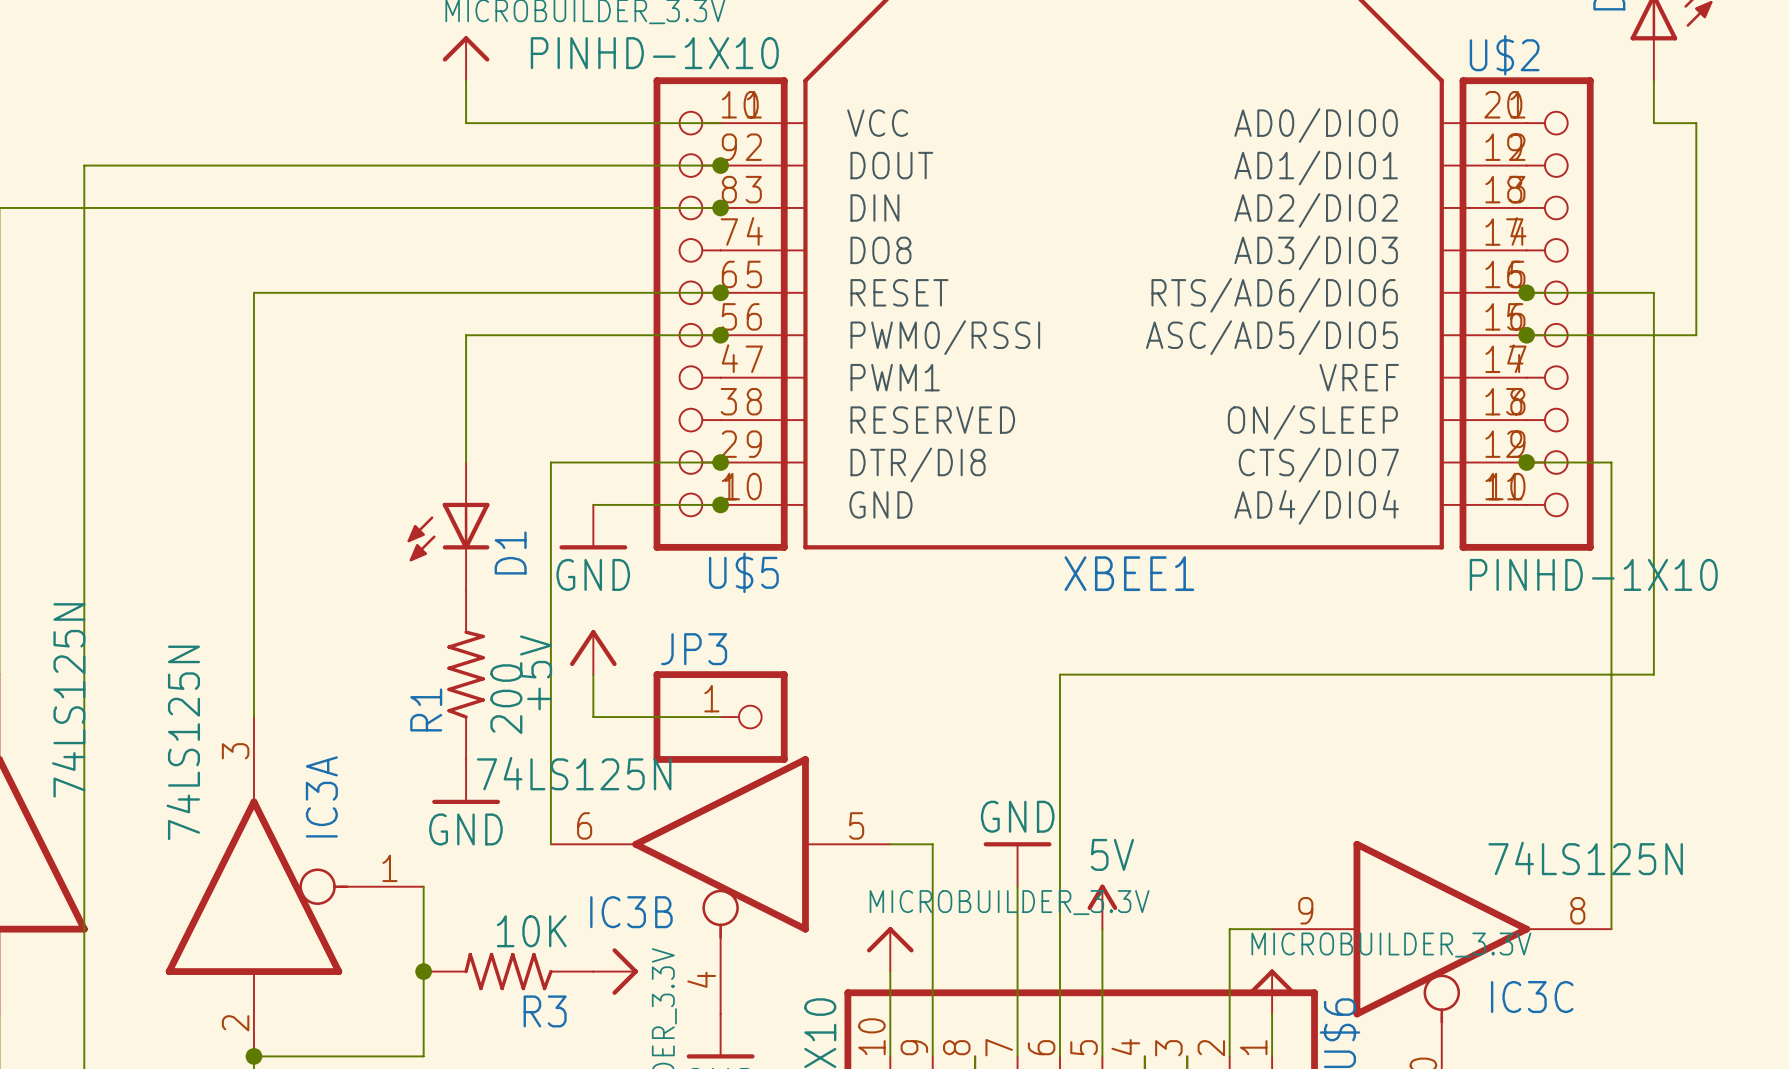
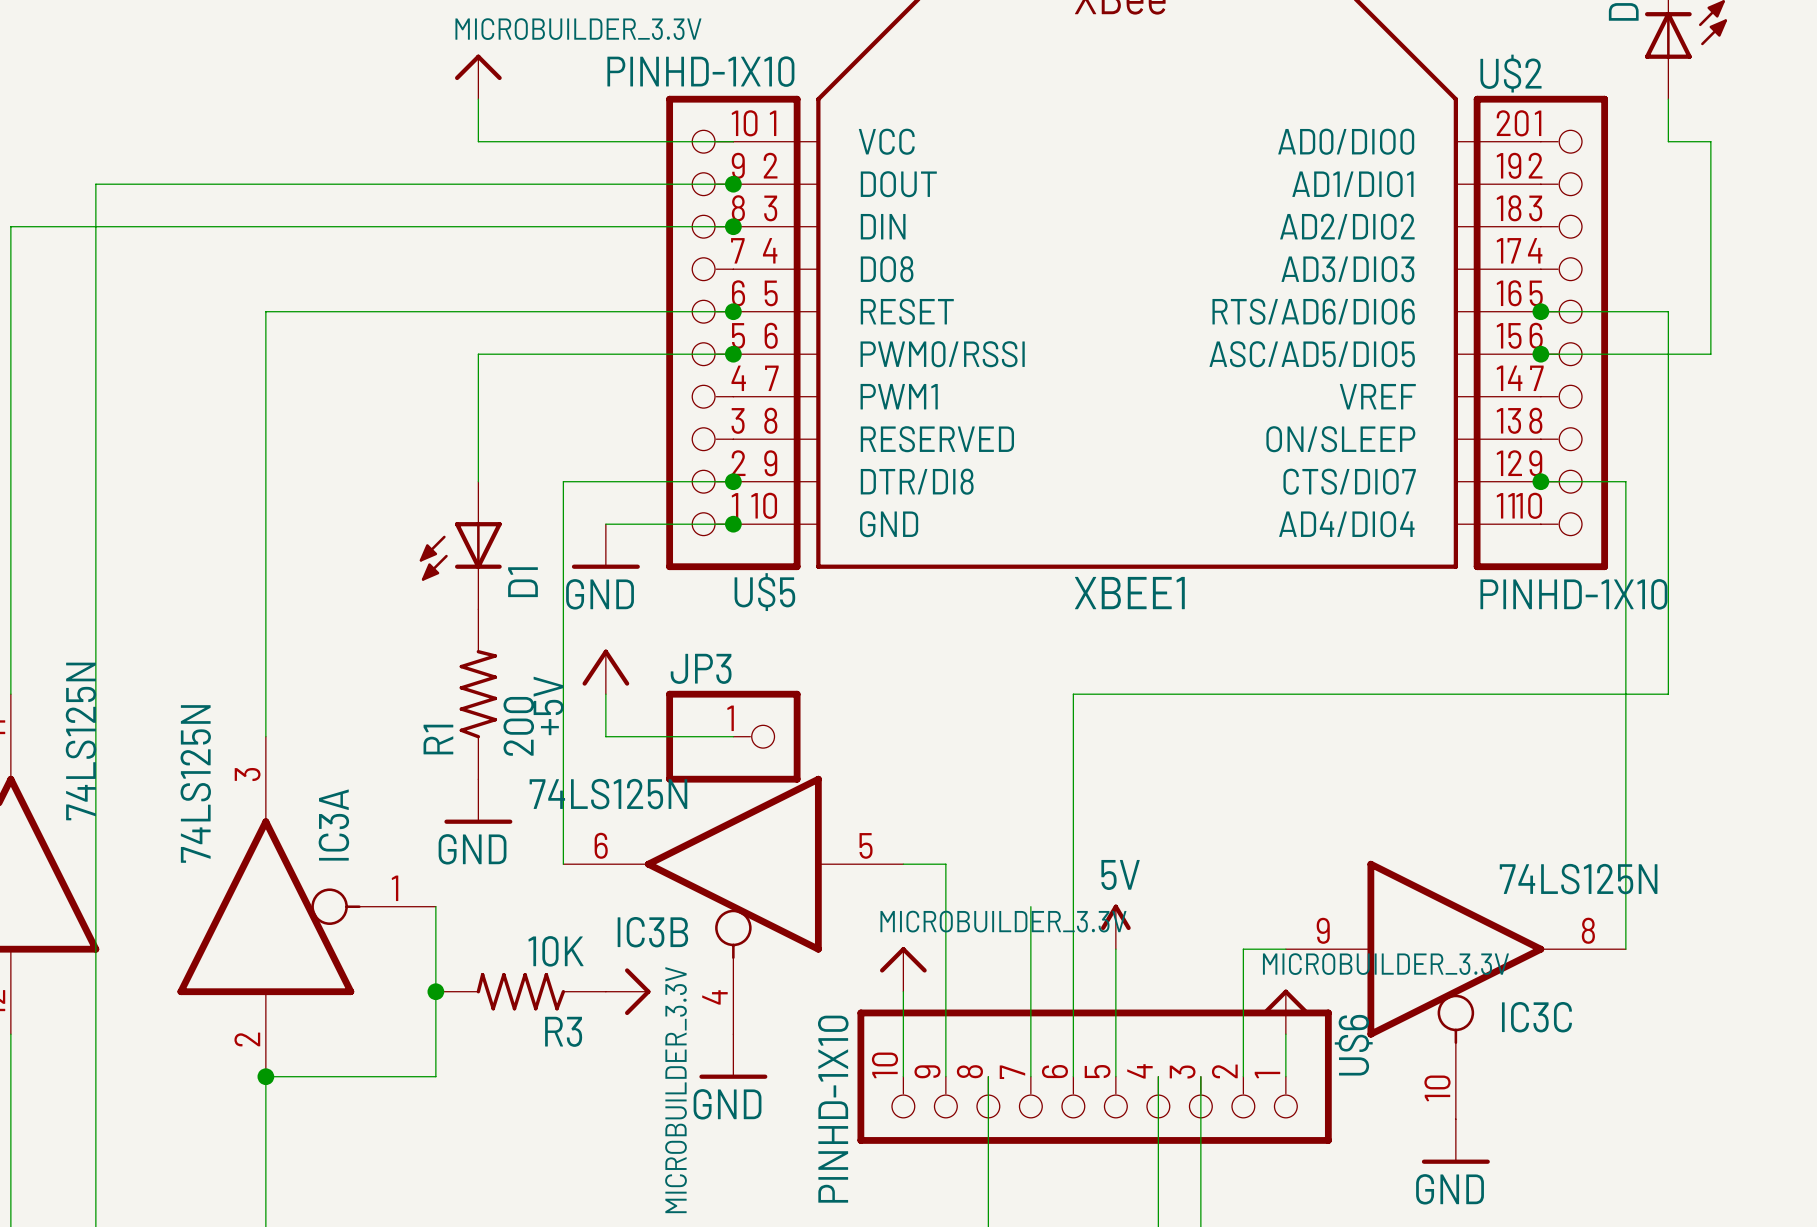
power symbol: GND (1017, 864) -> none

